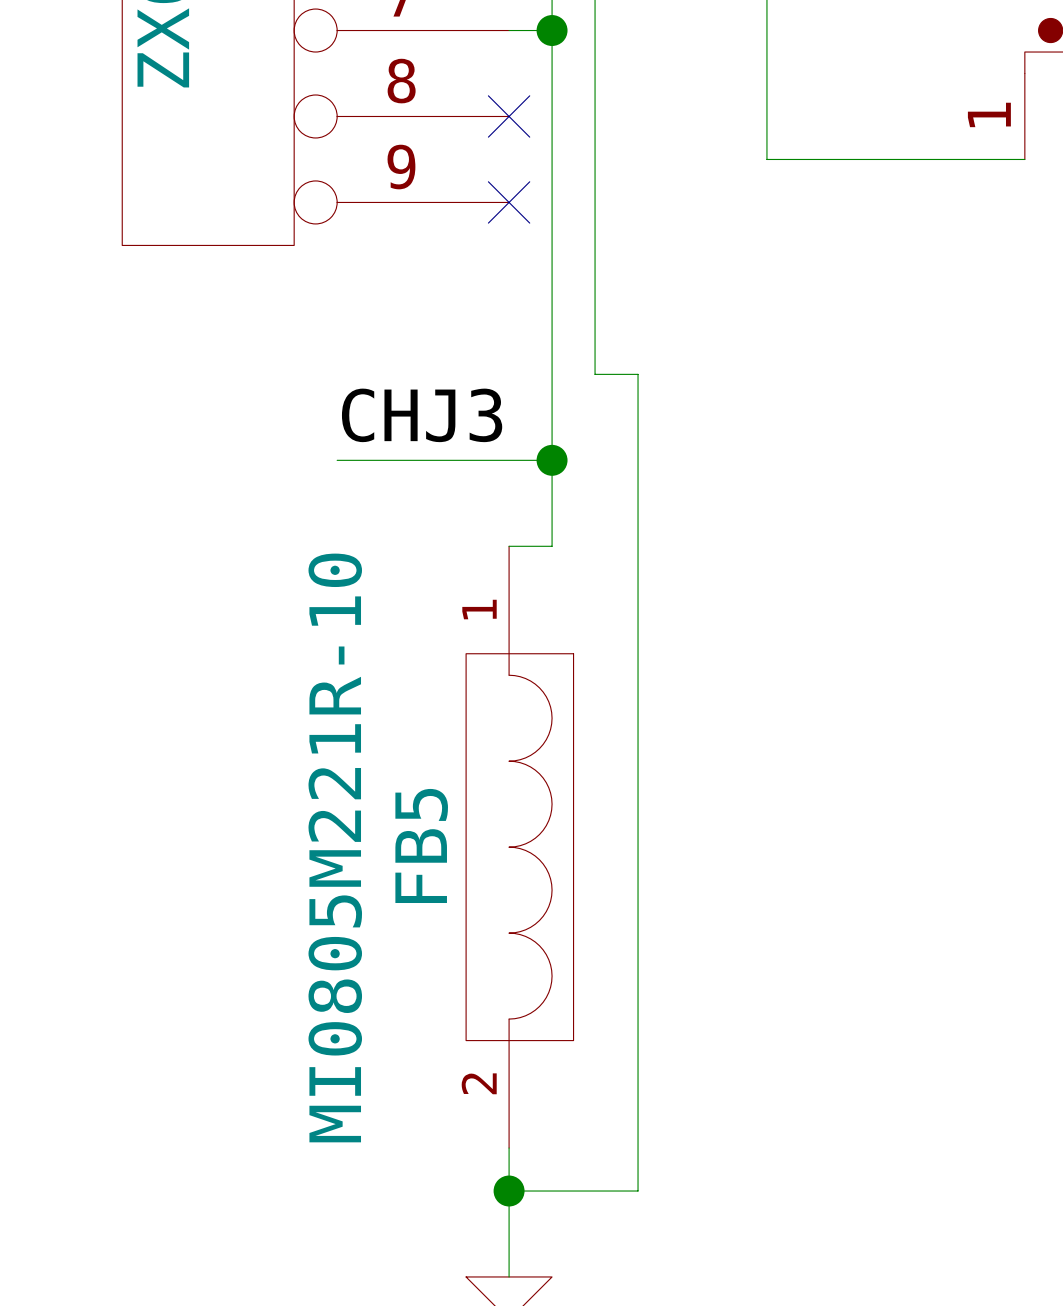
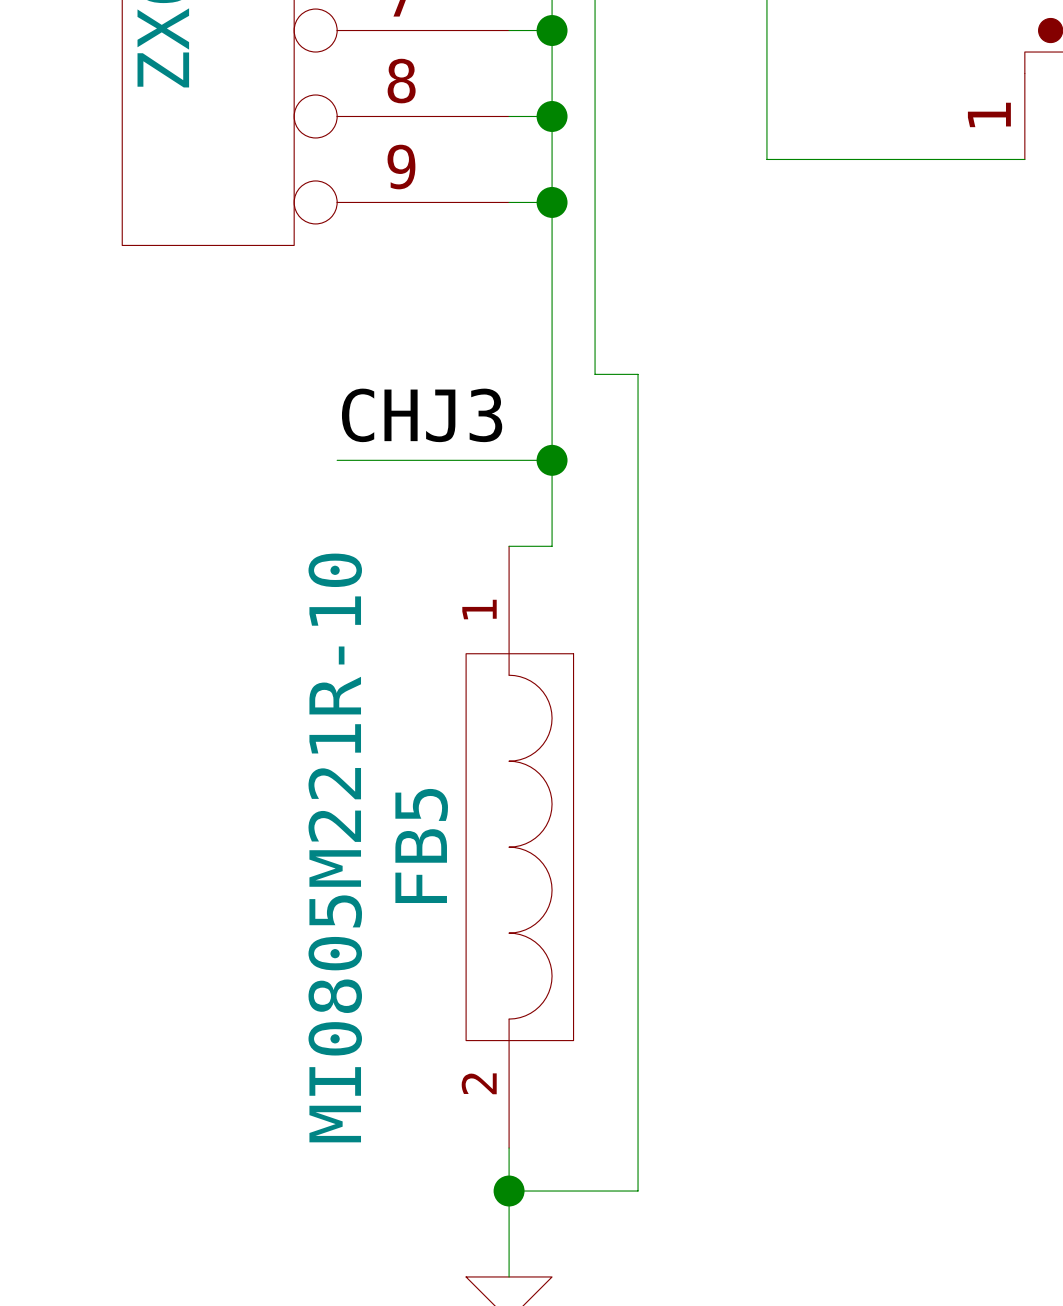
wire: none -> (509, 116) (552, 116)
no-connect mark: (509, 116) -> none
junction: none -> (552, 116)
wire: none -> (509, 202) (552, 202)
no-connect mark: (509, 202) -> none
junction: none -> (552, 202)

